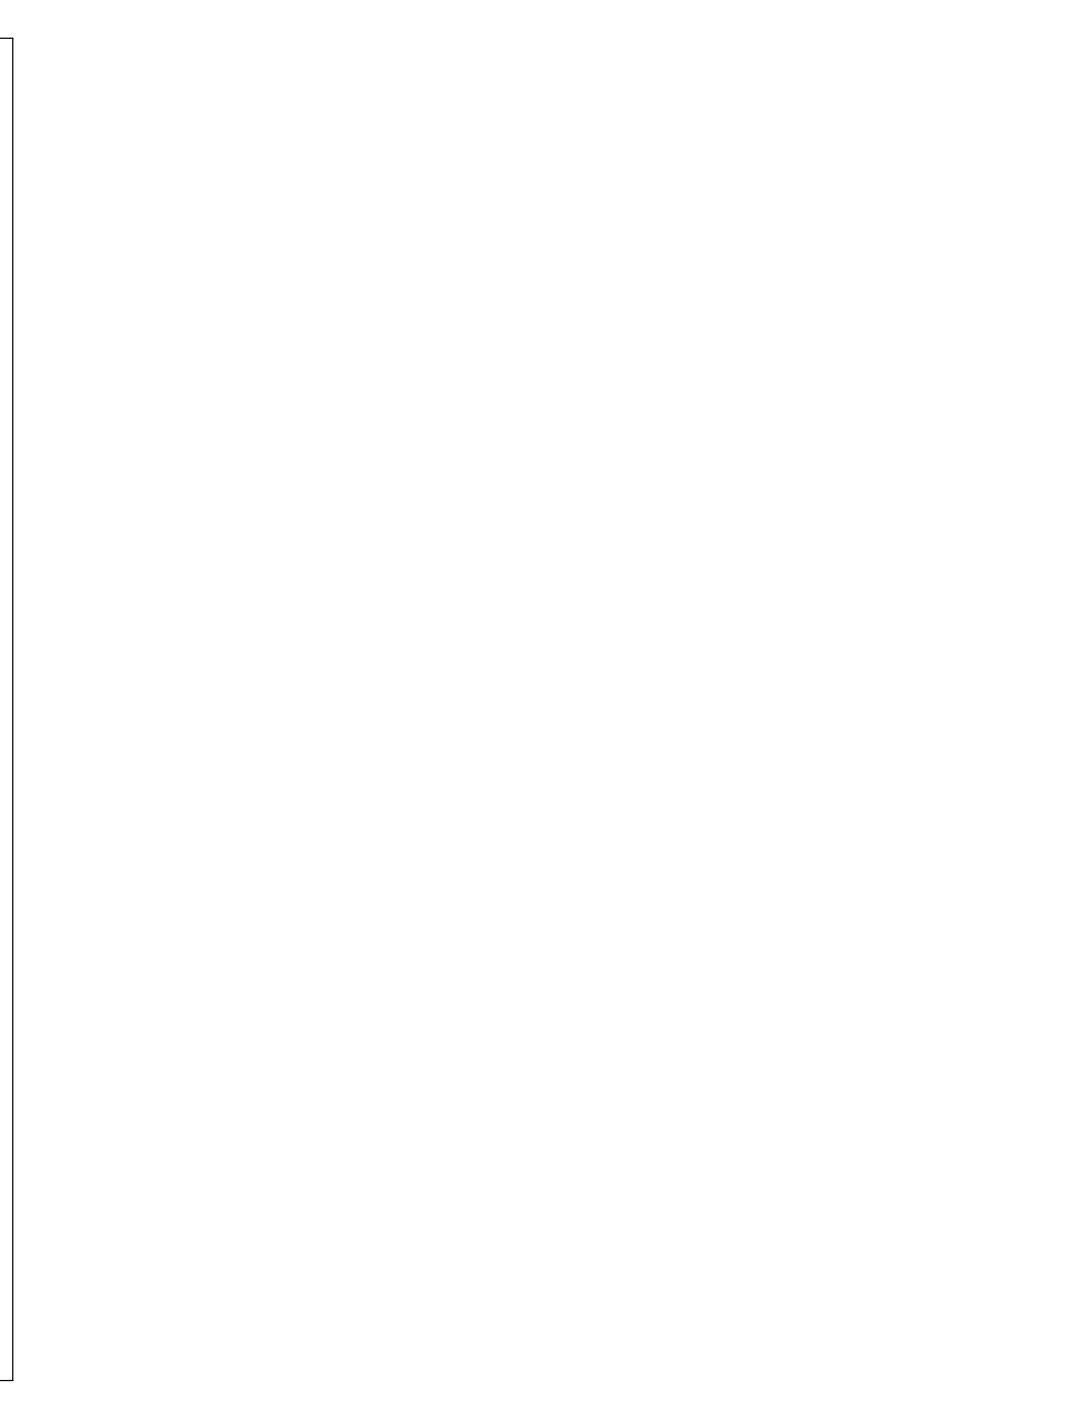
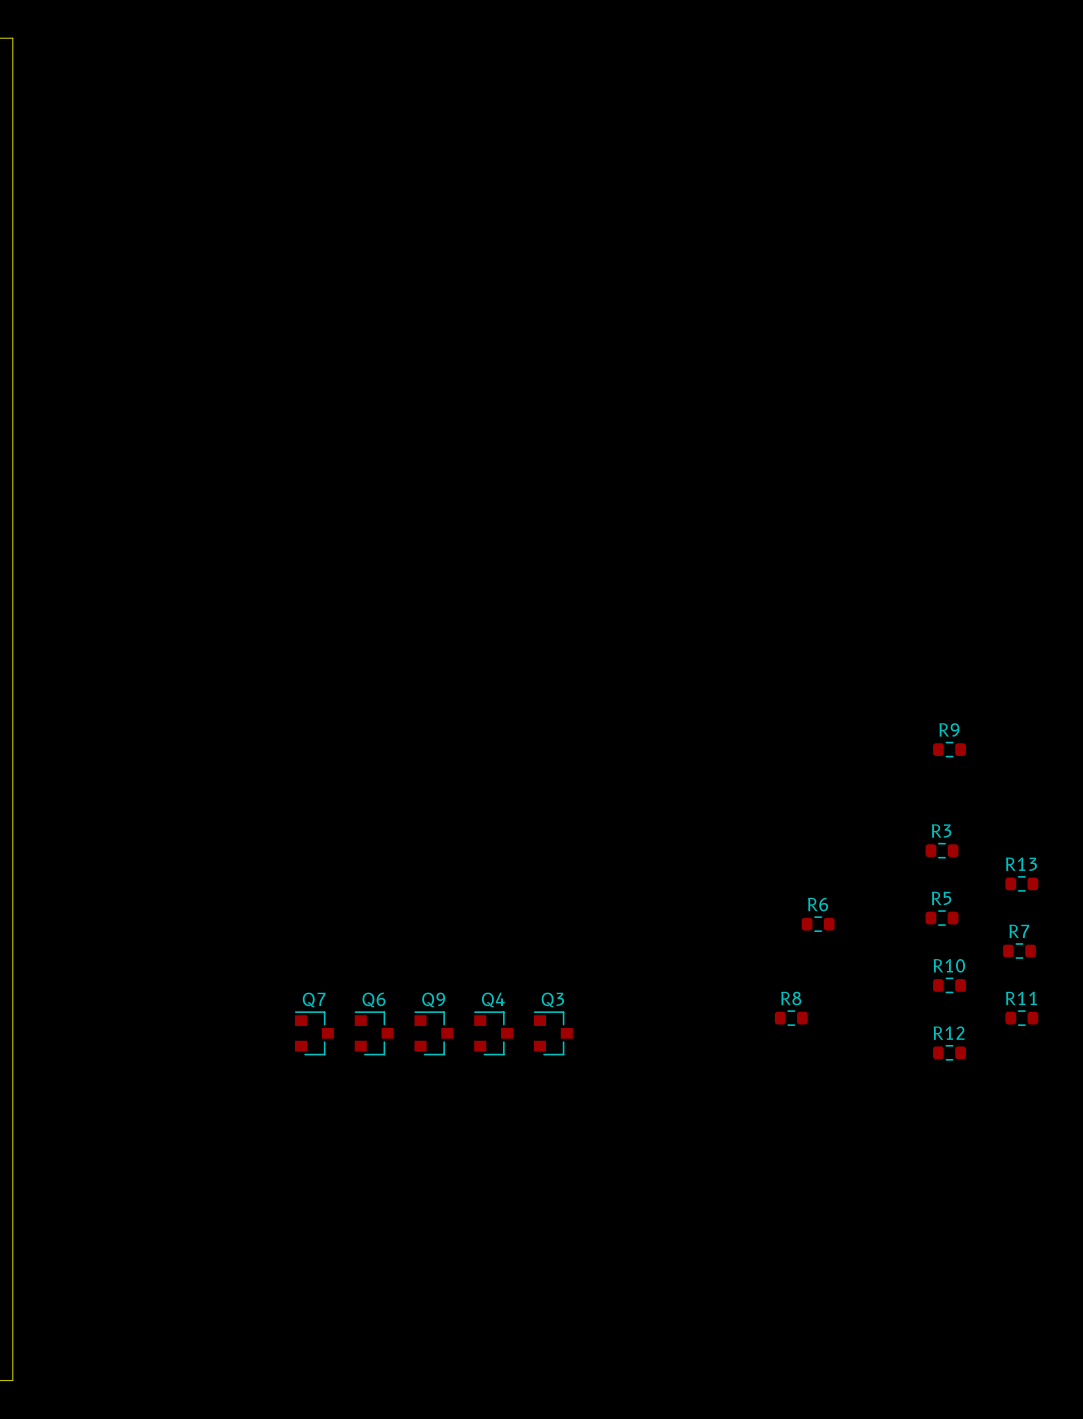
R9: none -> (949, 749)
R3: none -> (941, 850)
R13: none -> (1021, 883)
R5: none -> (941, 918)
R6: none -> (818, 924)
R7: none -> (1019, 951)
R10: none -> (949, 985)
R8: none -> (791, 1018)
R11: none -> (1021, 1018)
Q7: none -> (314, 1033)
Q6: none -> (374, 1033)
Q9: none -> (433, 1033)
Q4: none -> (493, 1033)
Q3: none -> (553, 1033)
R12: none -> (949, 1052)

